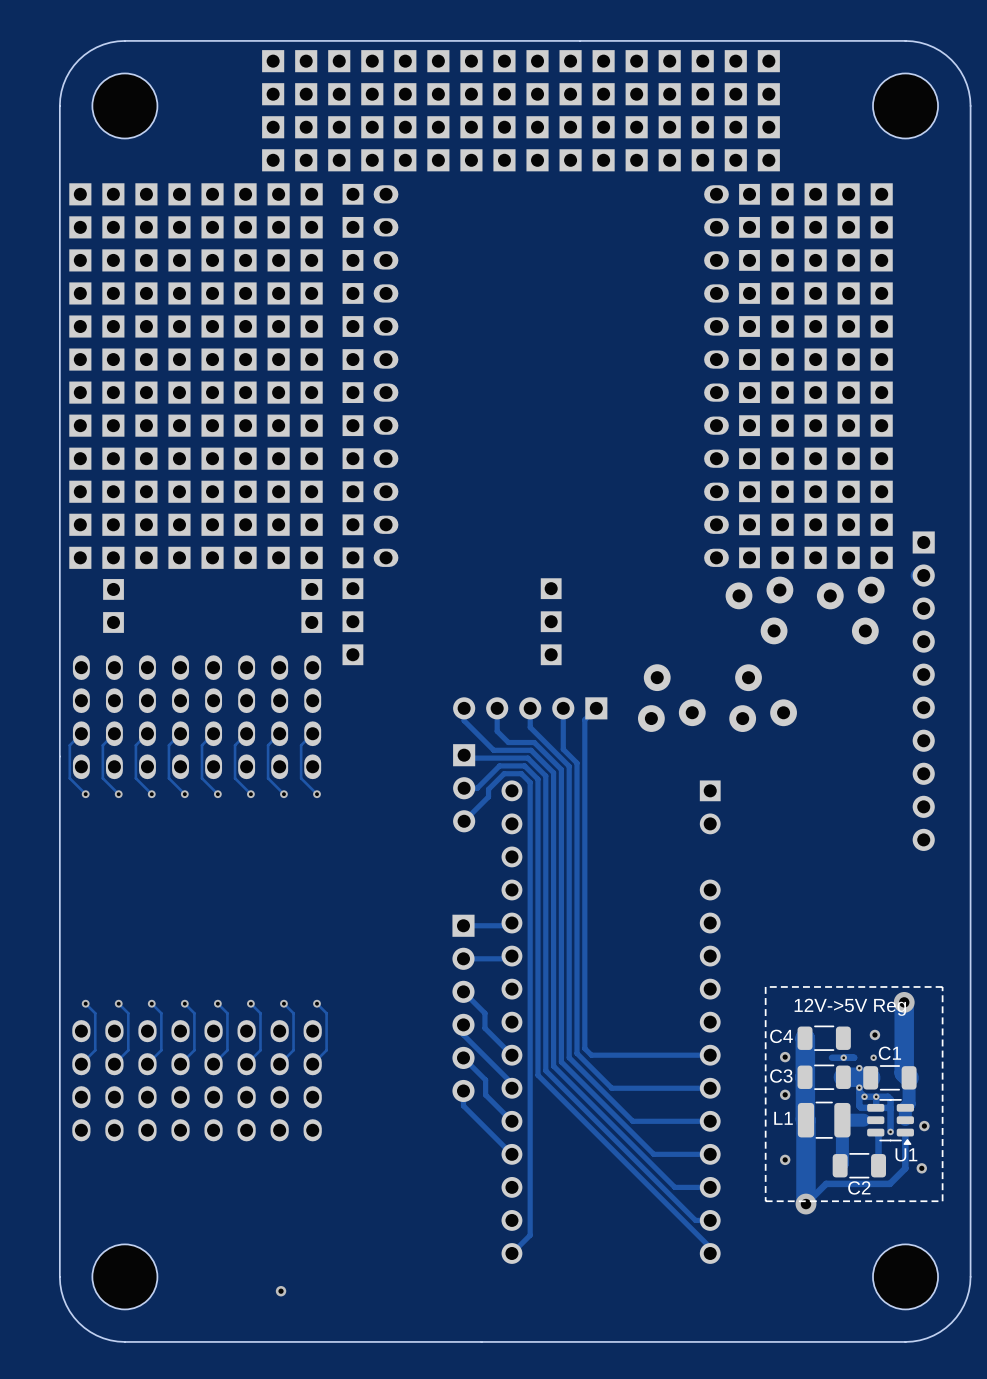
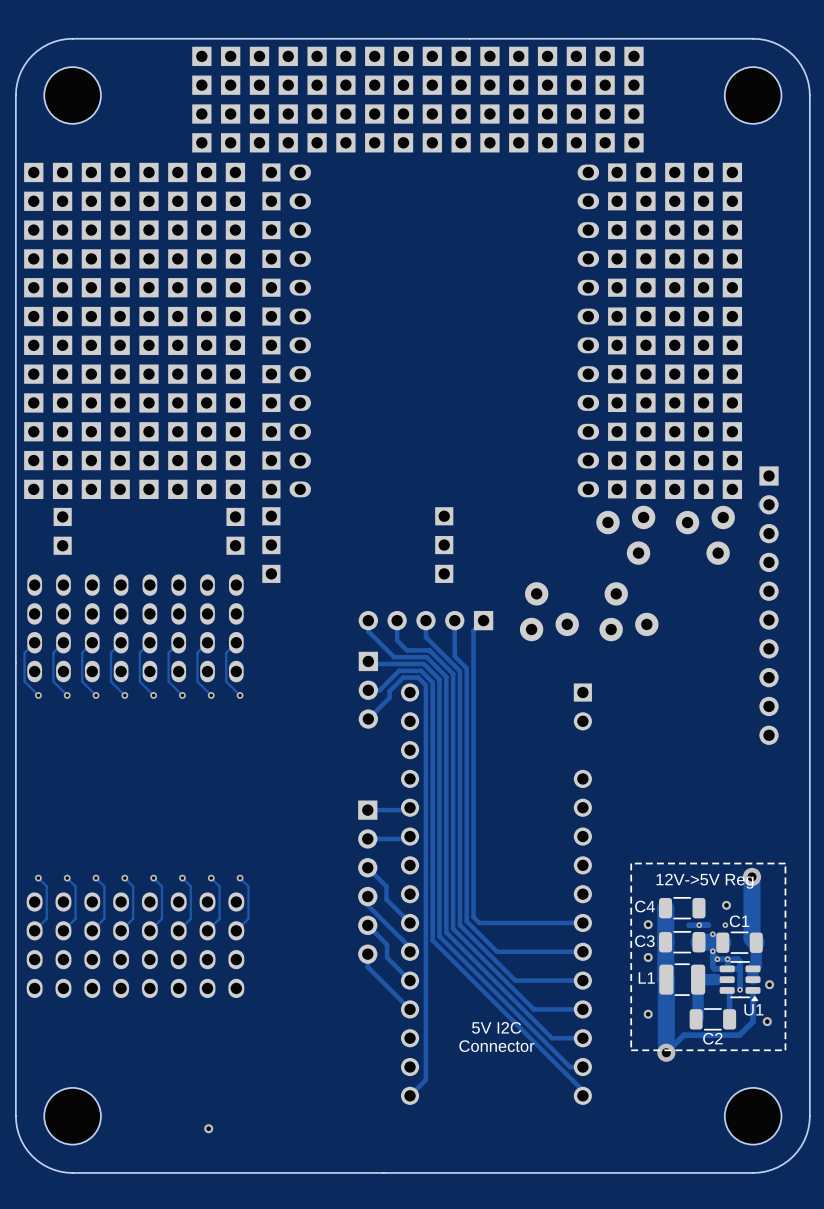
text: none -> 5V I2C (496, 1027)
text: none -> Connector (496, 1046)

